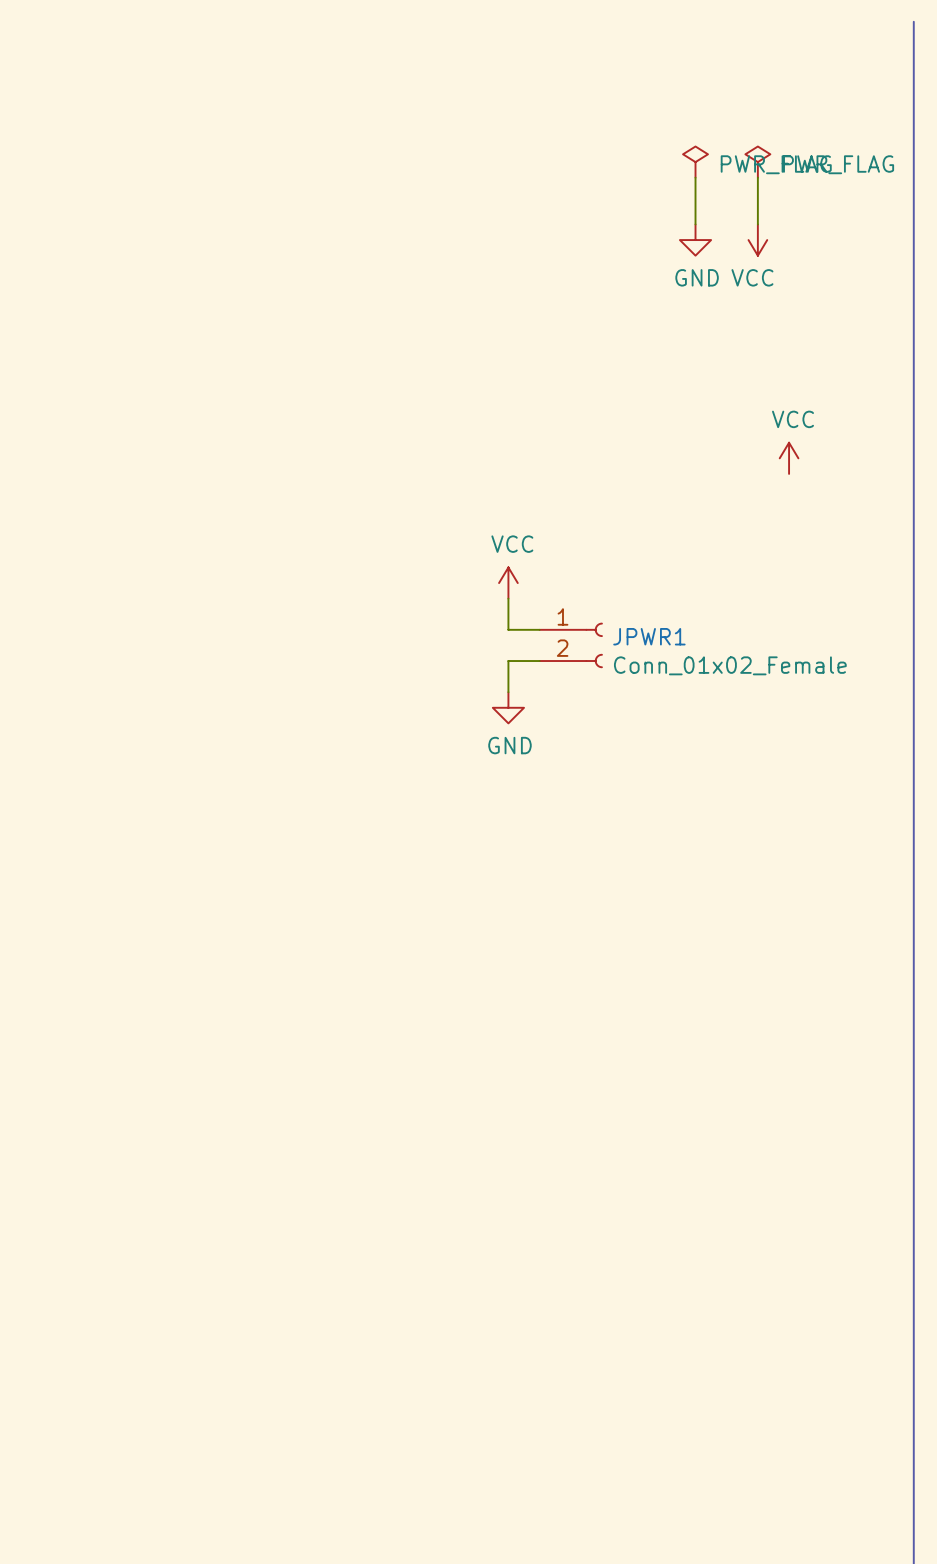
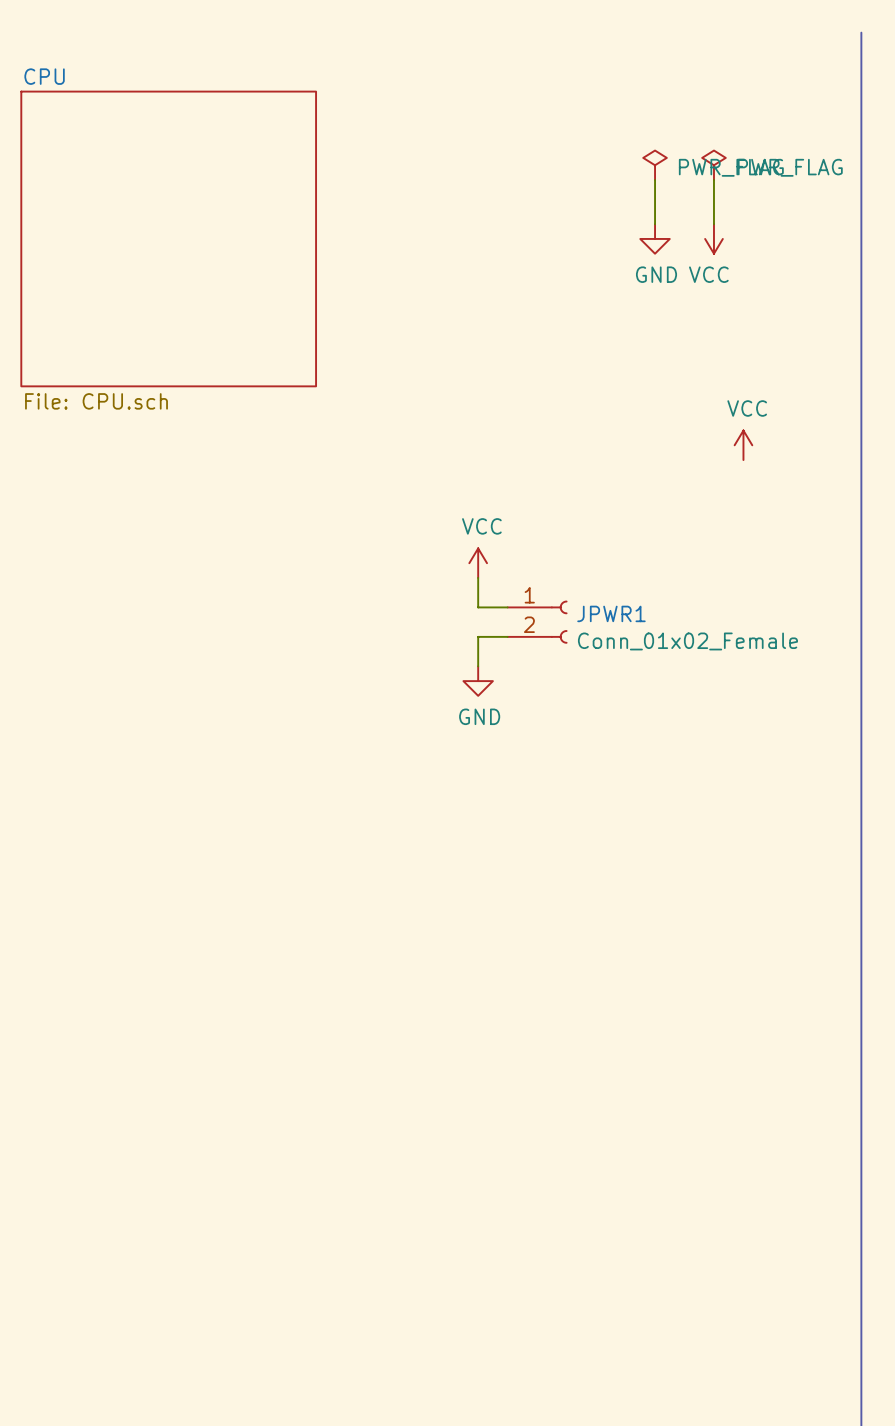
sheet CPU: none -> File: CPU.sch (168, 238)

